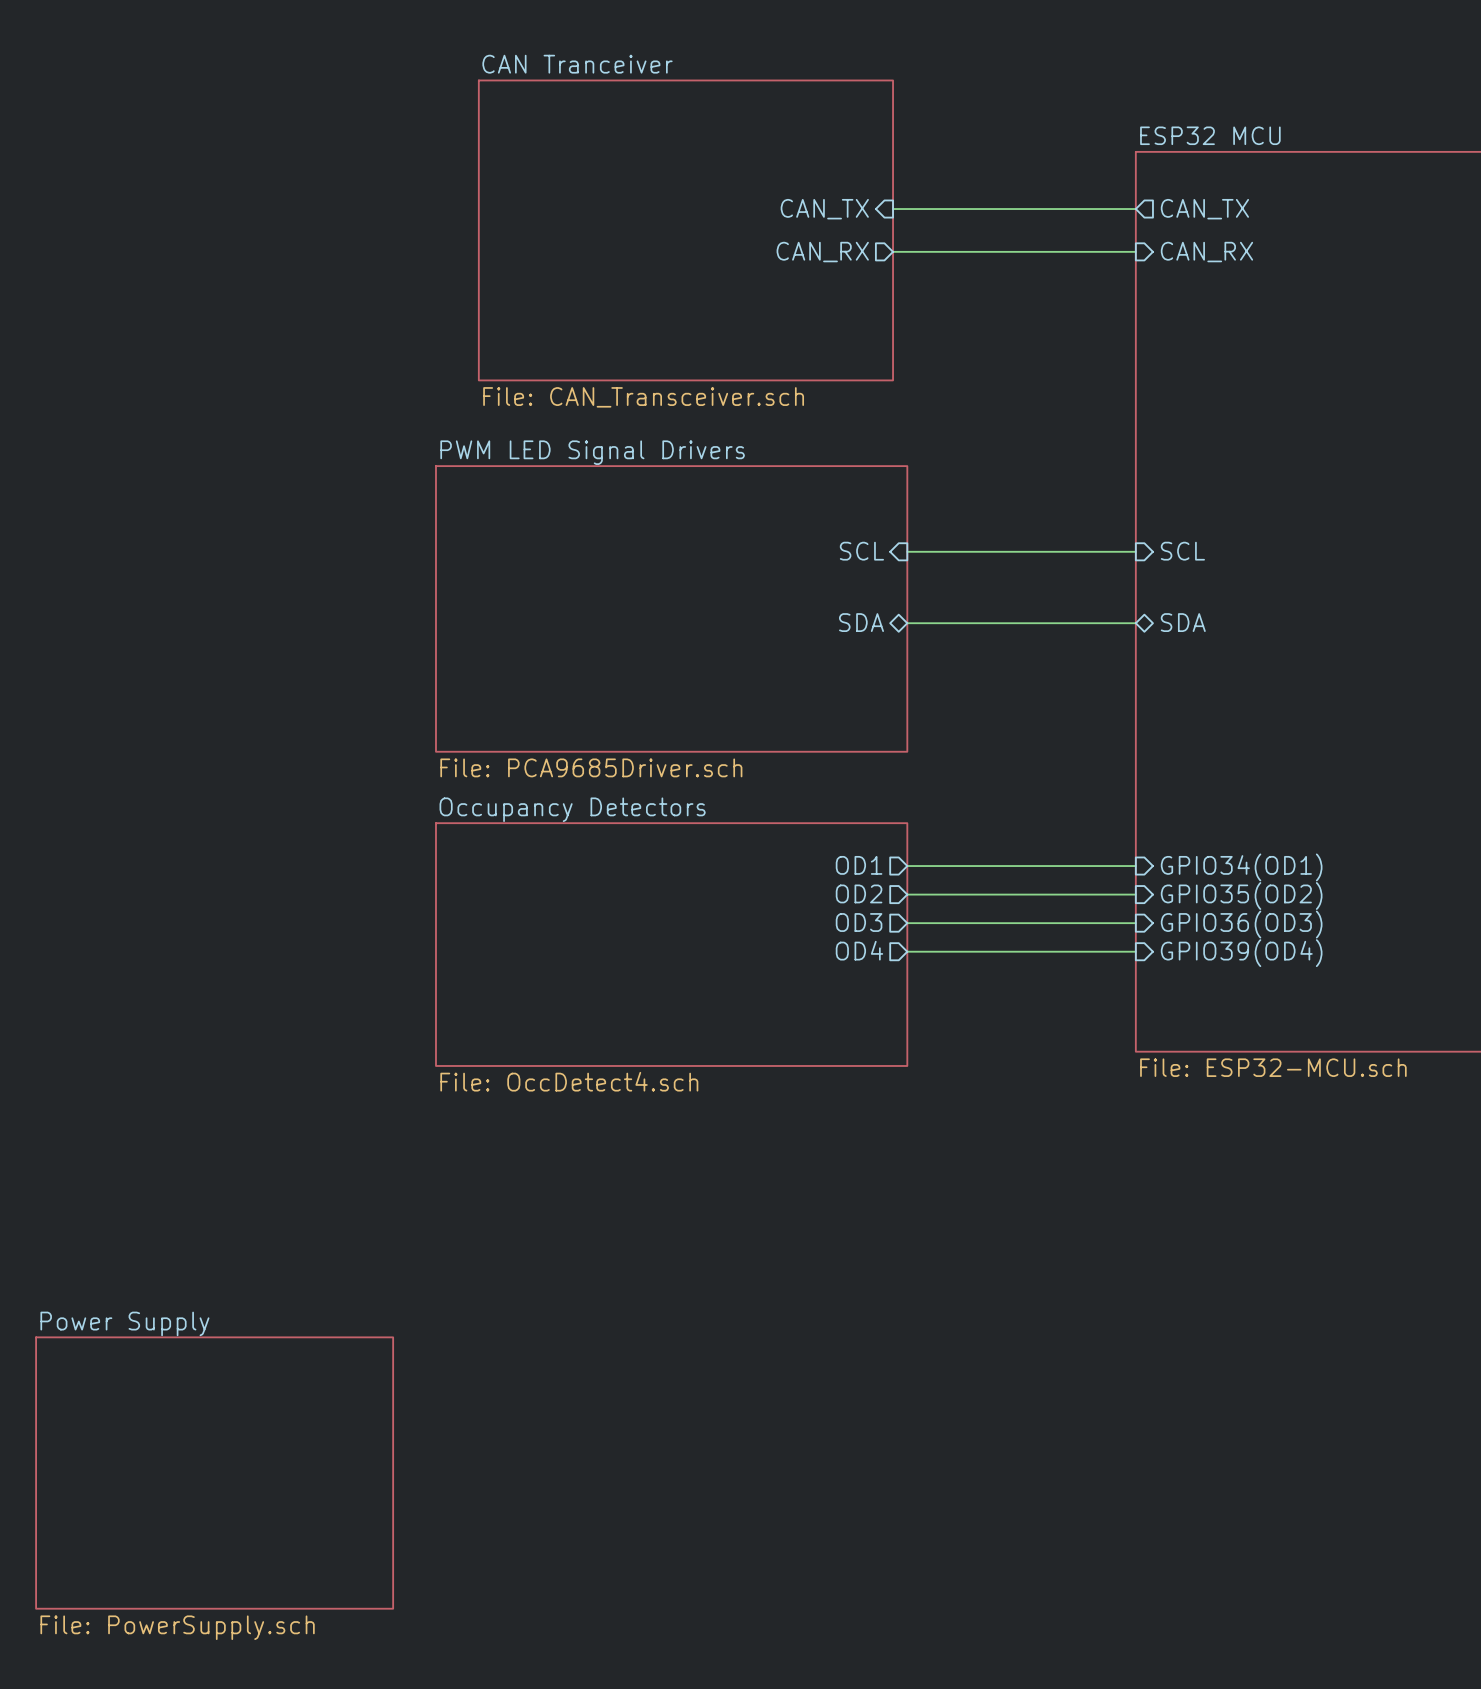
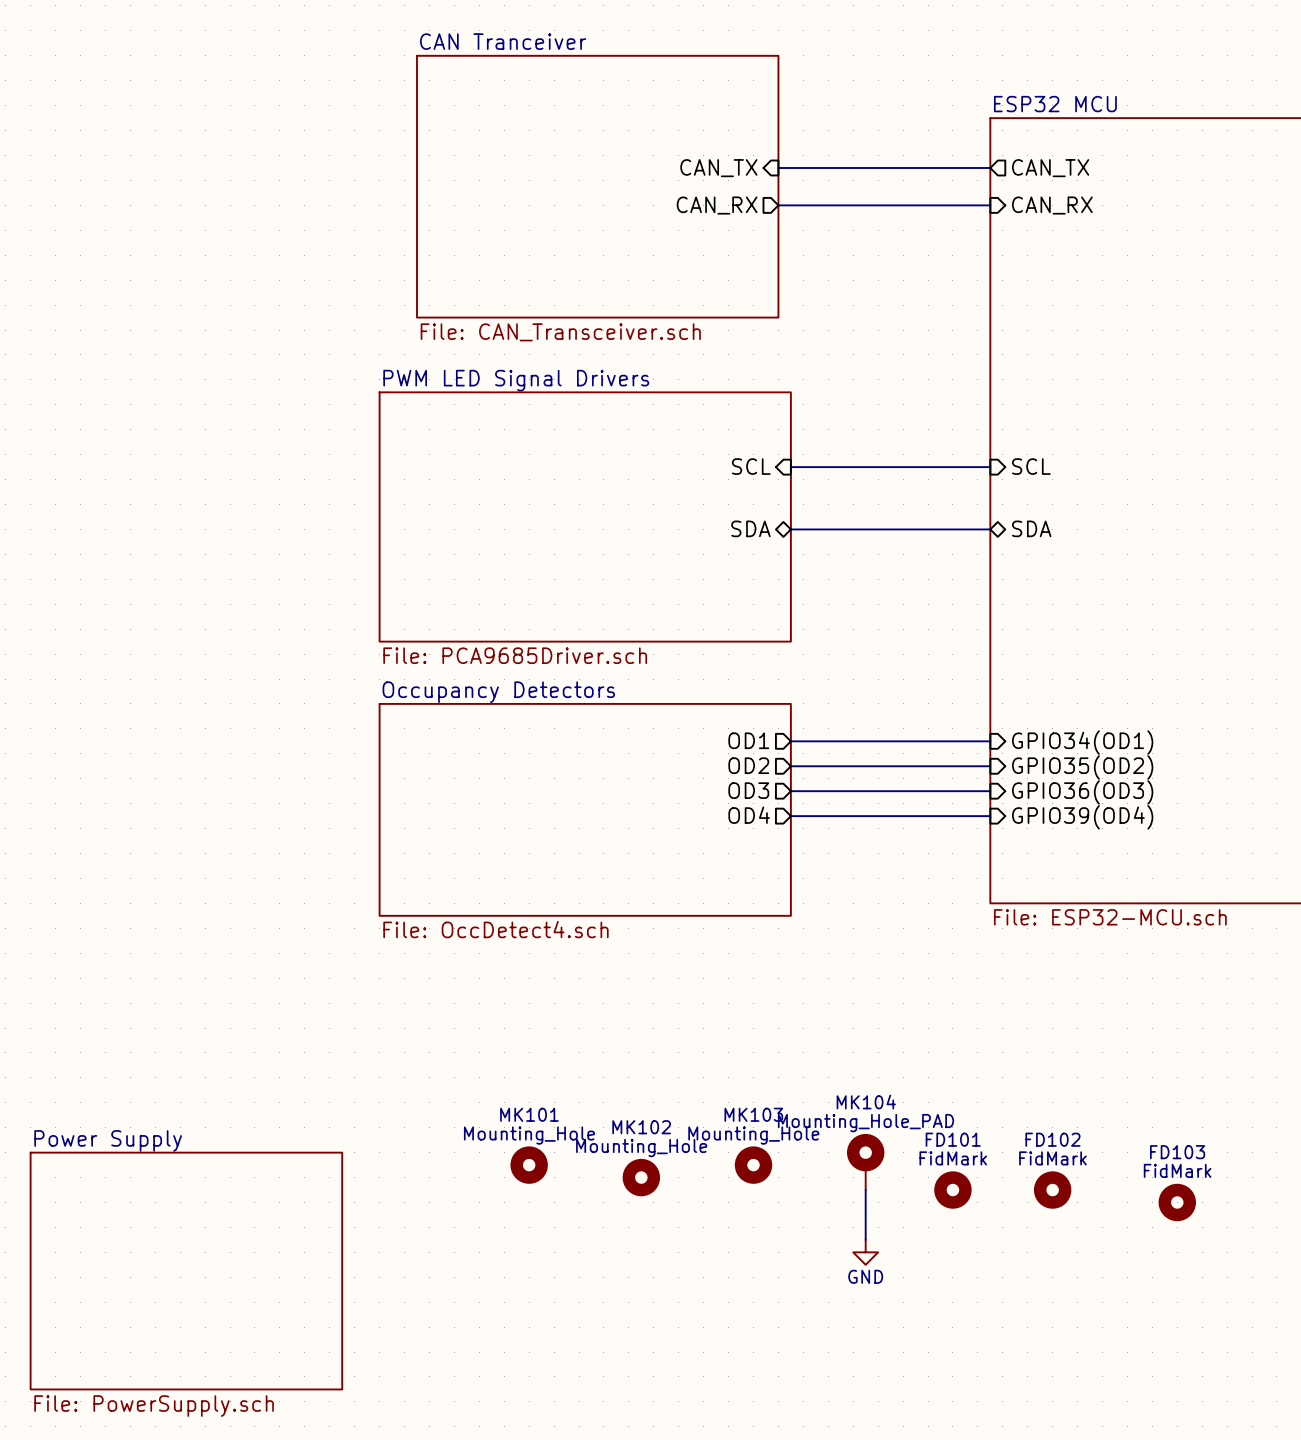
MK104: none -> Mounting_Hole_PAD (865, 1161)
MK101: none -> Mounting_Hole (529, 1165)
MK103: none -> Mounting_Hole (753, 1165)
MK102: none -> Mounting_Hole (641, 1177)
wire: none -> (865, 1190) (865, 1239)
FD101: none -> FidMark (952, 1190)
FD102: none -> FidMark (1052, 1190)
FD103: none -> FidMark (1177, 1202)
power symbol: none -> GND (865, 1252)

